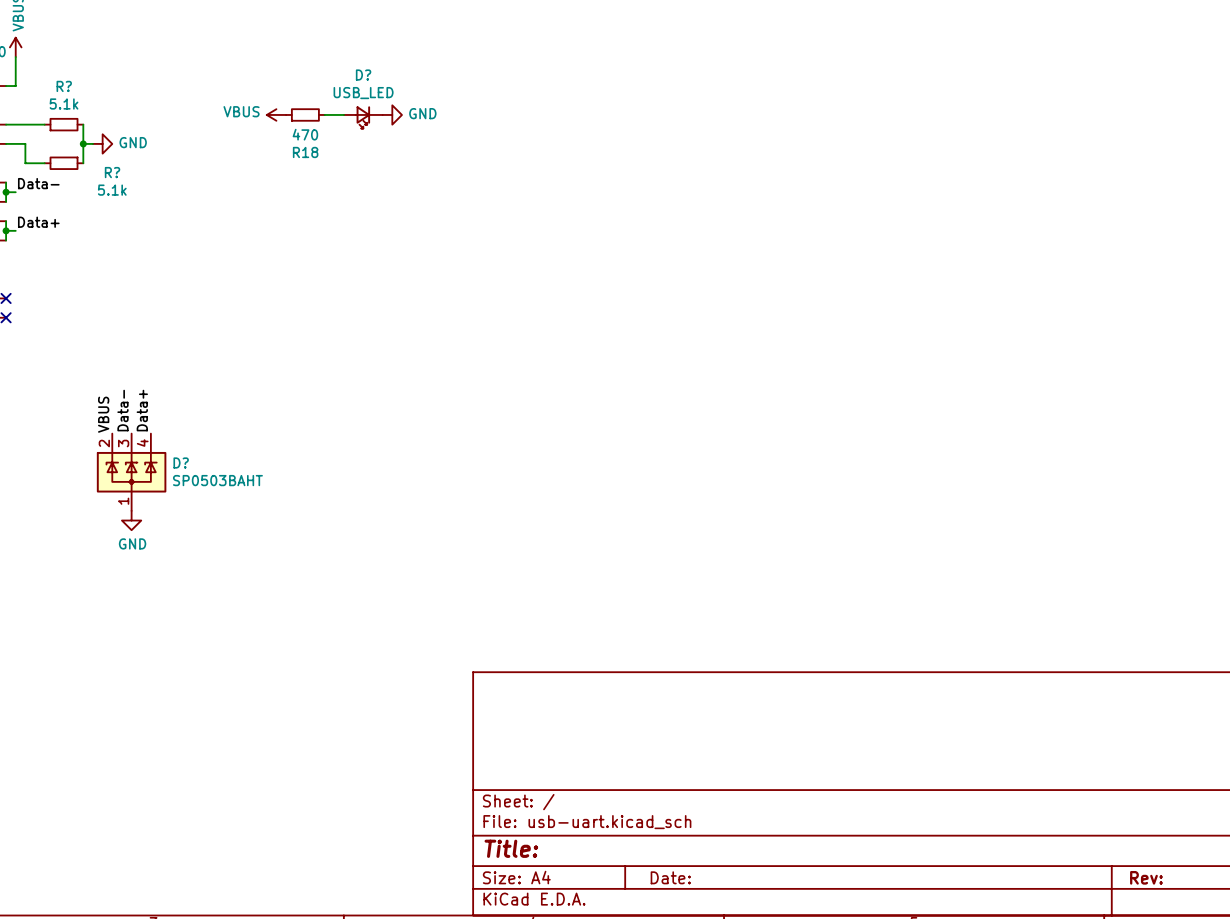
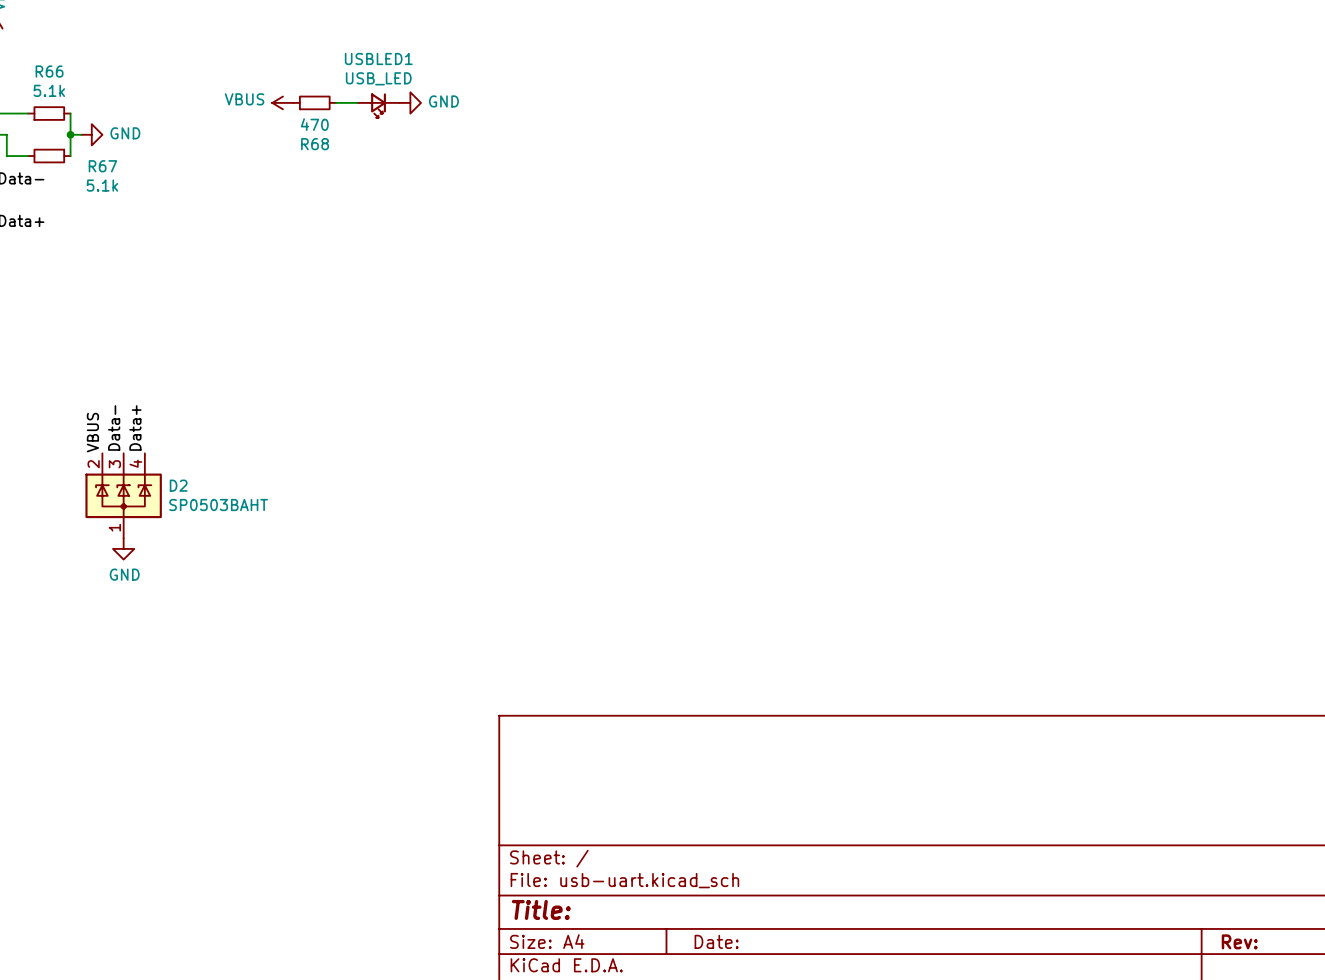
D? name: D? (363, 75) -> USBLED1 (378, 58)
R? name: R? (64, 86) -> R66 (49, 71)
R18 name: R18 (305, 152) -> R68 (315, 144)
R? name: R? (112, 172) -> R67 (102, 166)
D? name: D? (181, 463) -> D2 (178, 485)

